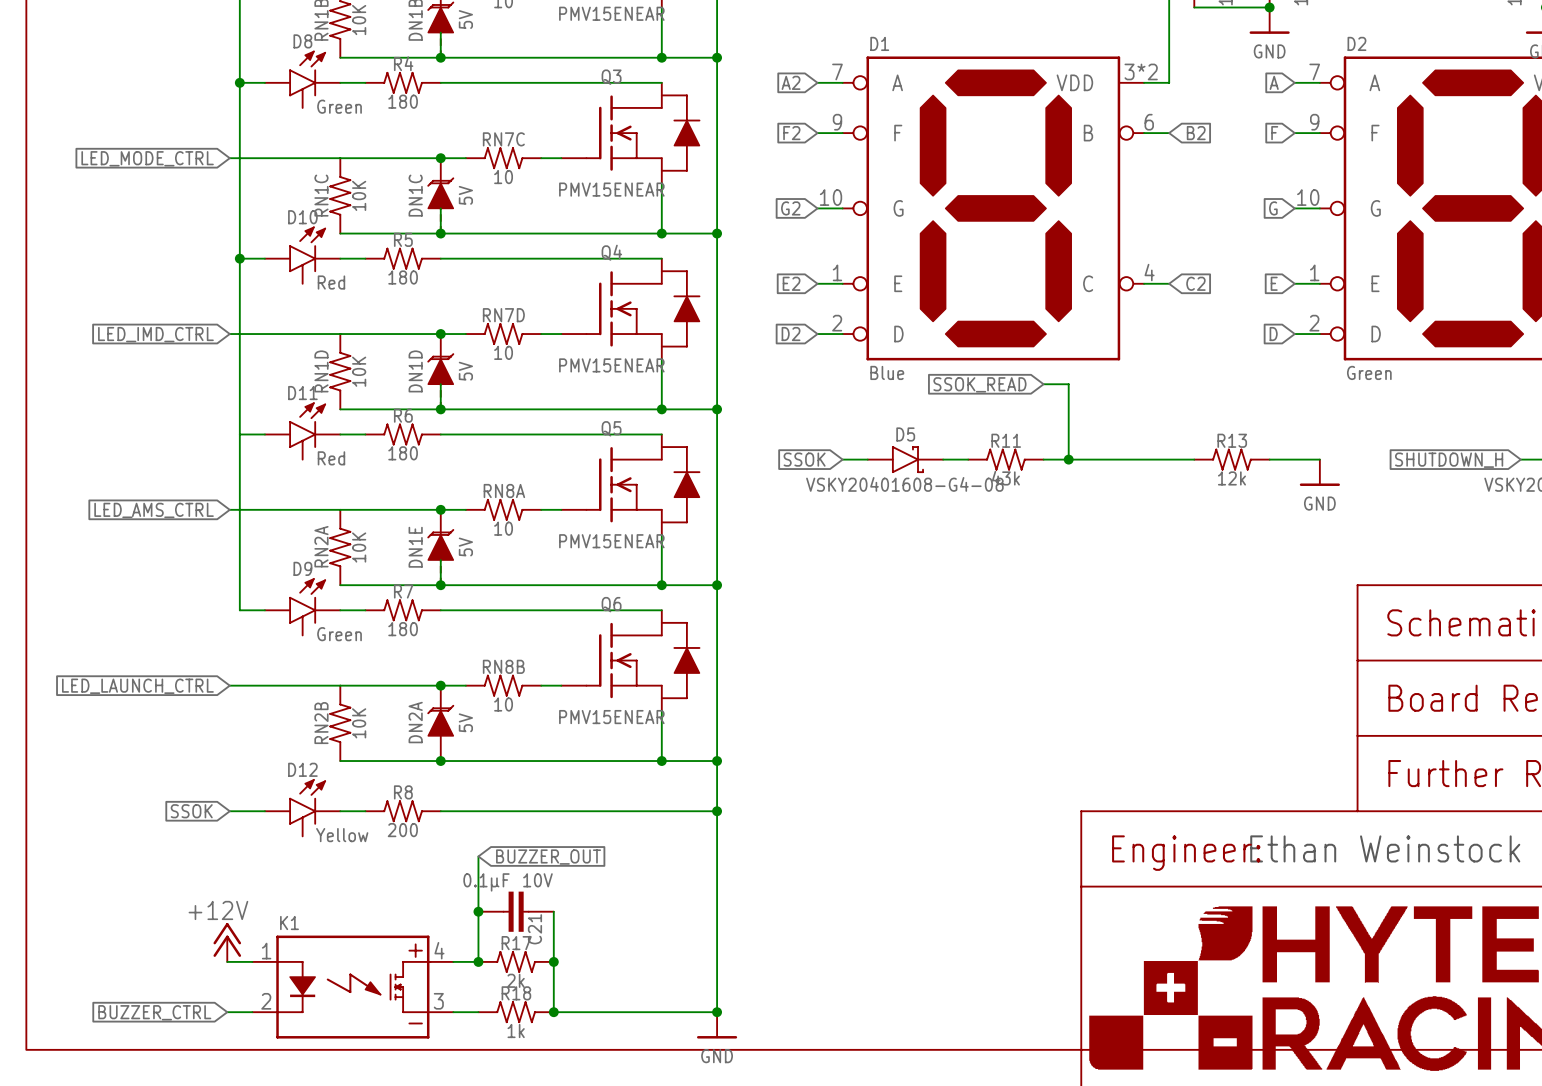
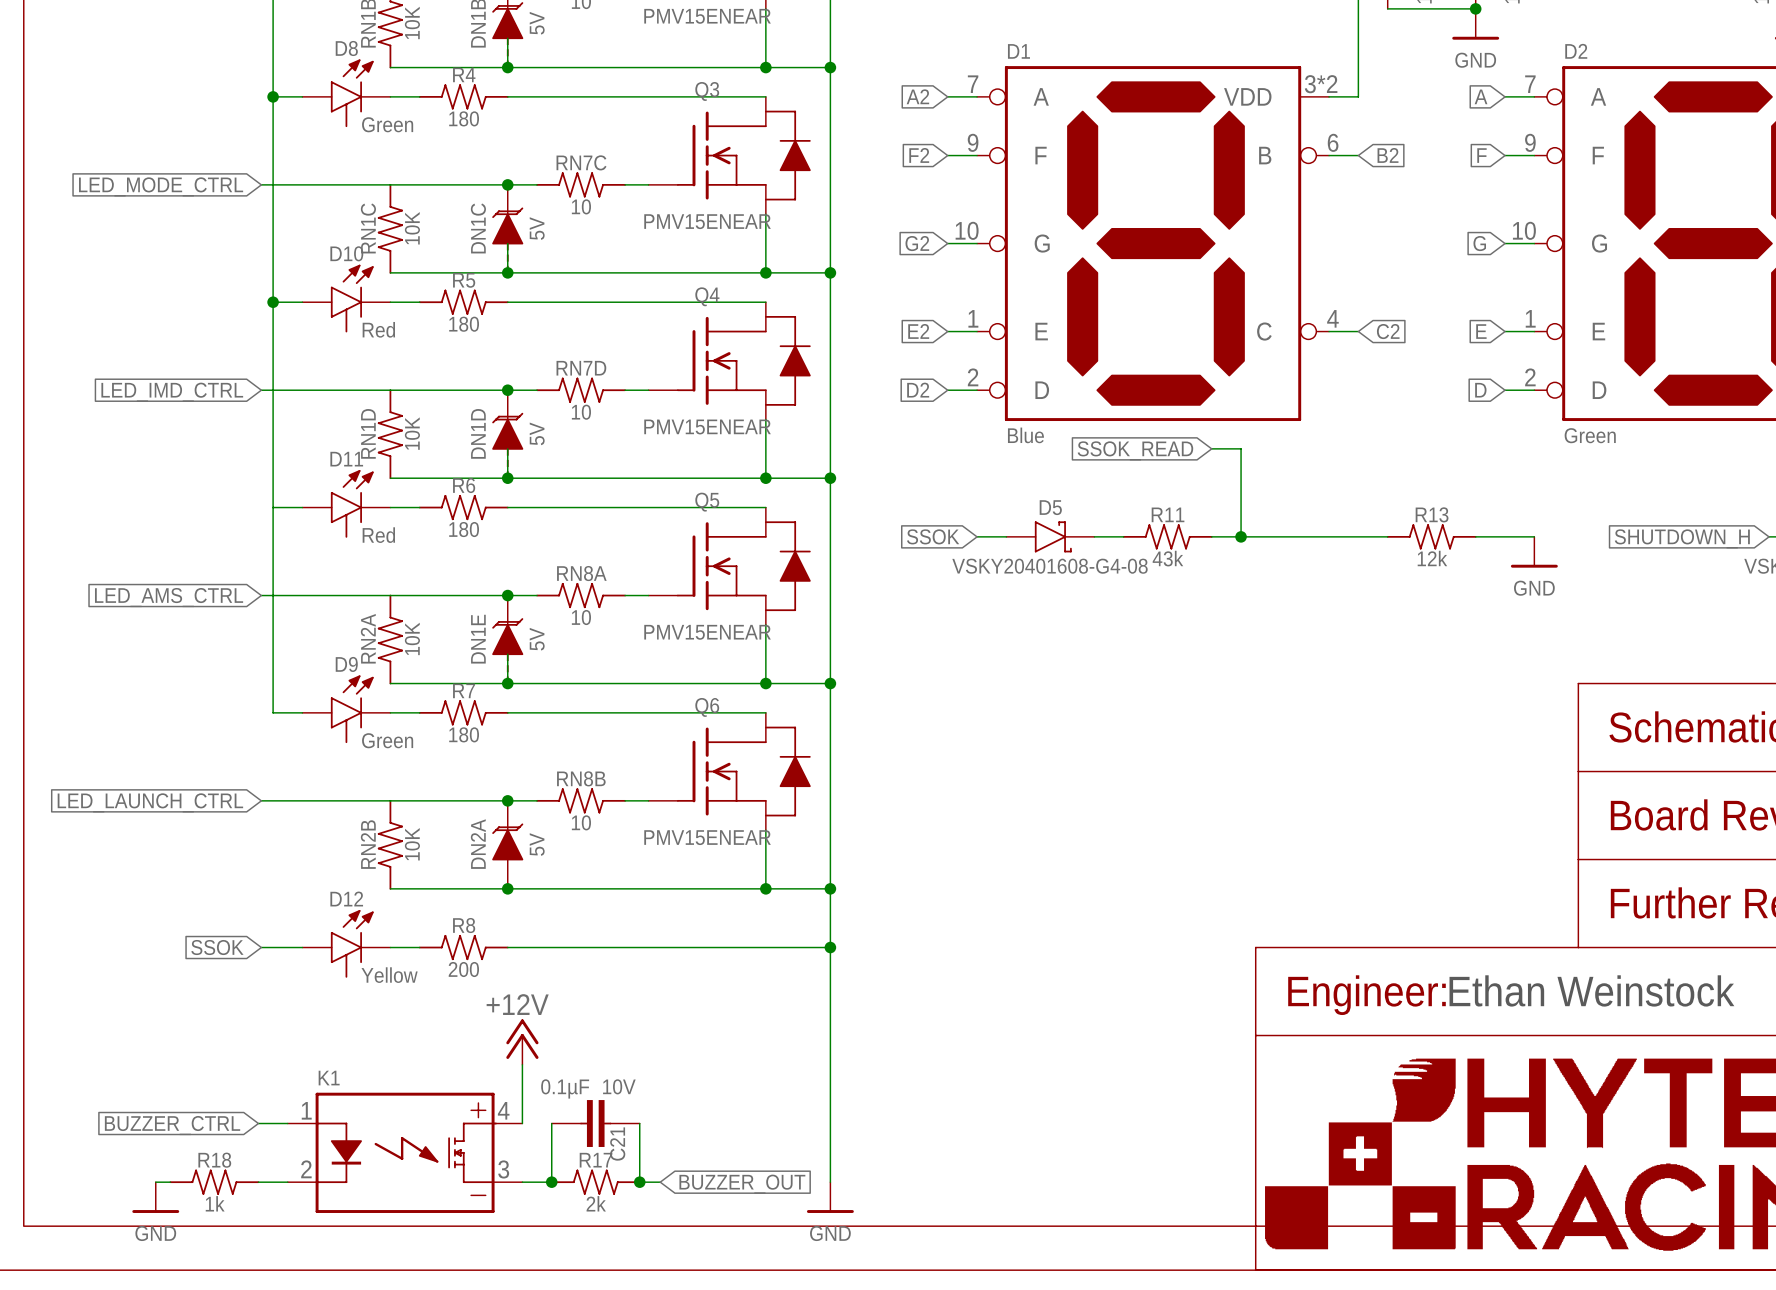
wire: (478, 856) (478, 961) (453, 961) -> (522, 1064) (522, 1123)
global label position: BUZZER_OUT (548, 857) -> BUZZER_OUT (742, 1184)
junction: (478, 911) -> none
C21 position: (516, 911) -> (595, 1123)
wire: (553, 911) (553, 961) -> (551, 1123) (551, 1182)
power symbol position: +12V (227, 942) -> +12V (522, 1042)
junction: (478, 961) -> none
R17: (516, 961) -> none
junction: (553, 961) -> none
R18 name: R18 (516, 993) -> R17 (596, 1160)
global label position: BUZZER_CTRL (154, 1012) -> BUZZER_CTRL (172, 1125)
R18: none -> (214, 1182)
junction: none -> (551, 1182)
wire: (571, 1012) (717, 1012) -> none
junction: (717, 1012) -> none
power symbol: none -> GND (155, 1197)
R18 text: 1k (516, 1031) -> 2k (596, 1203)

